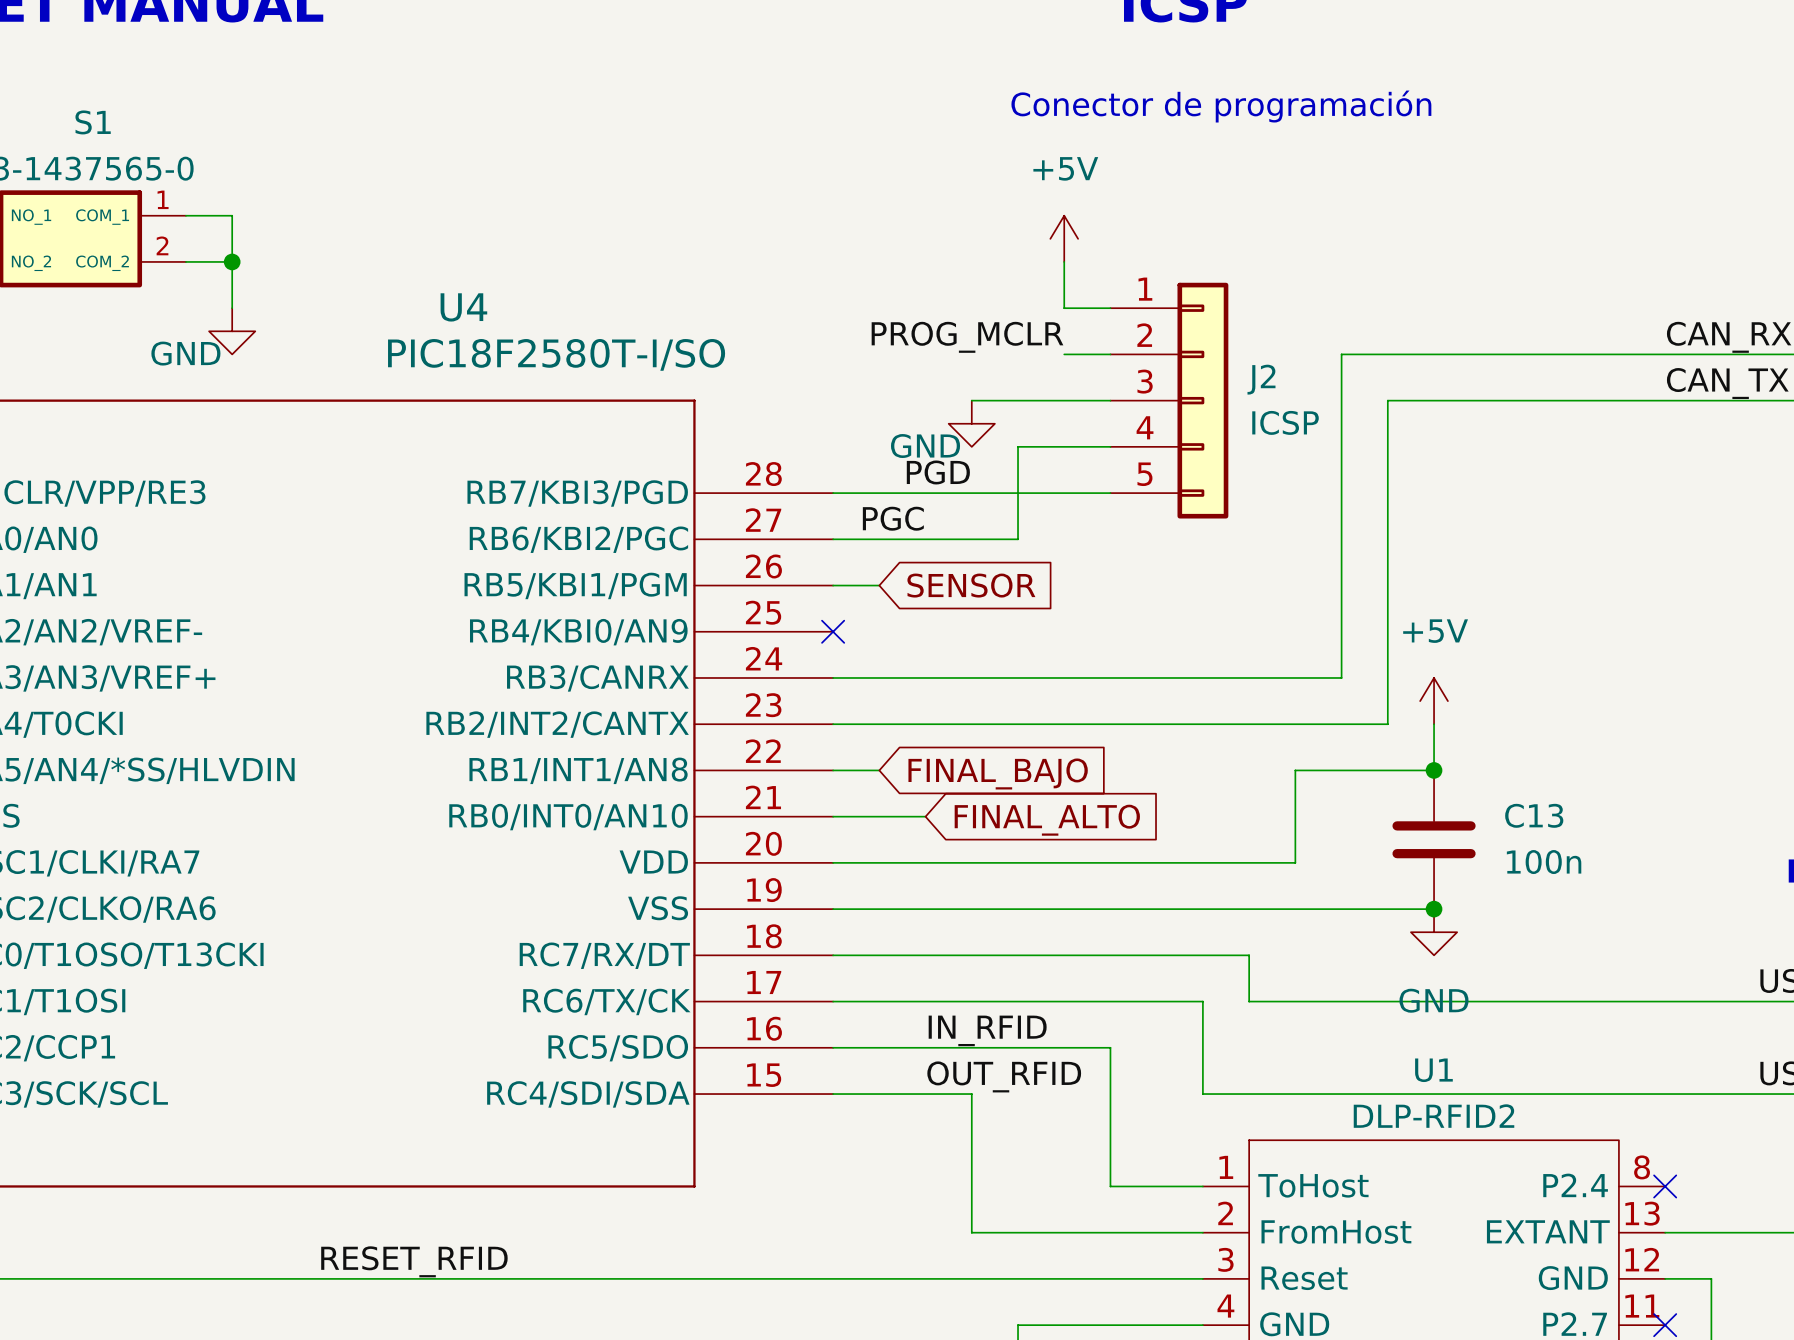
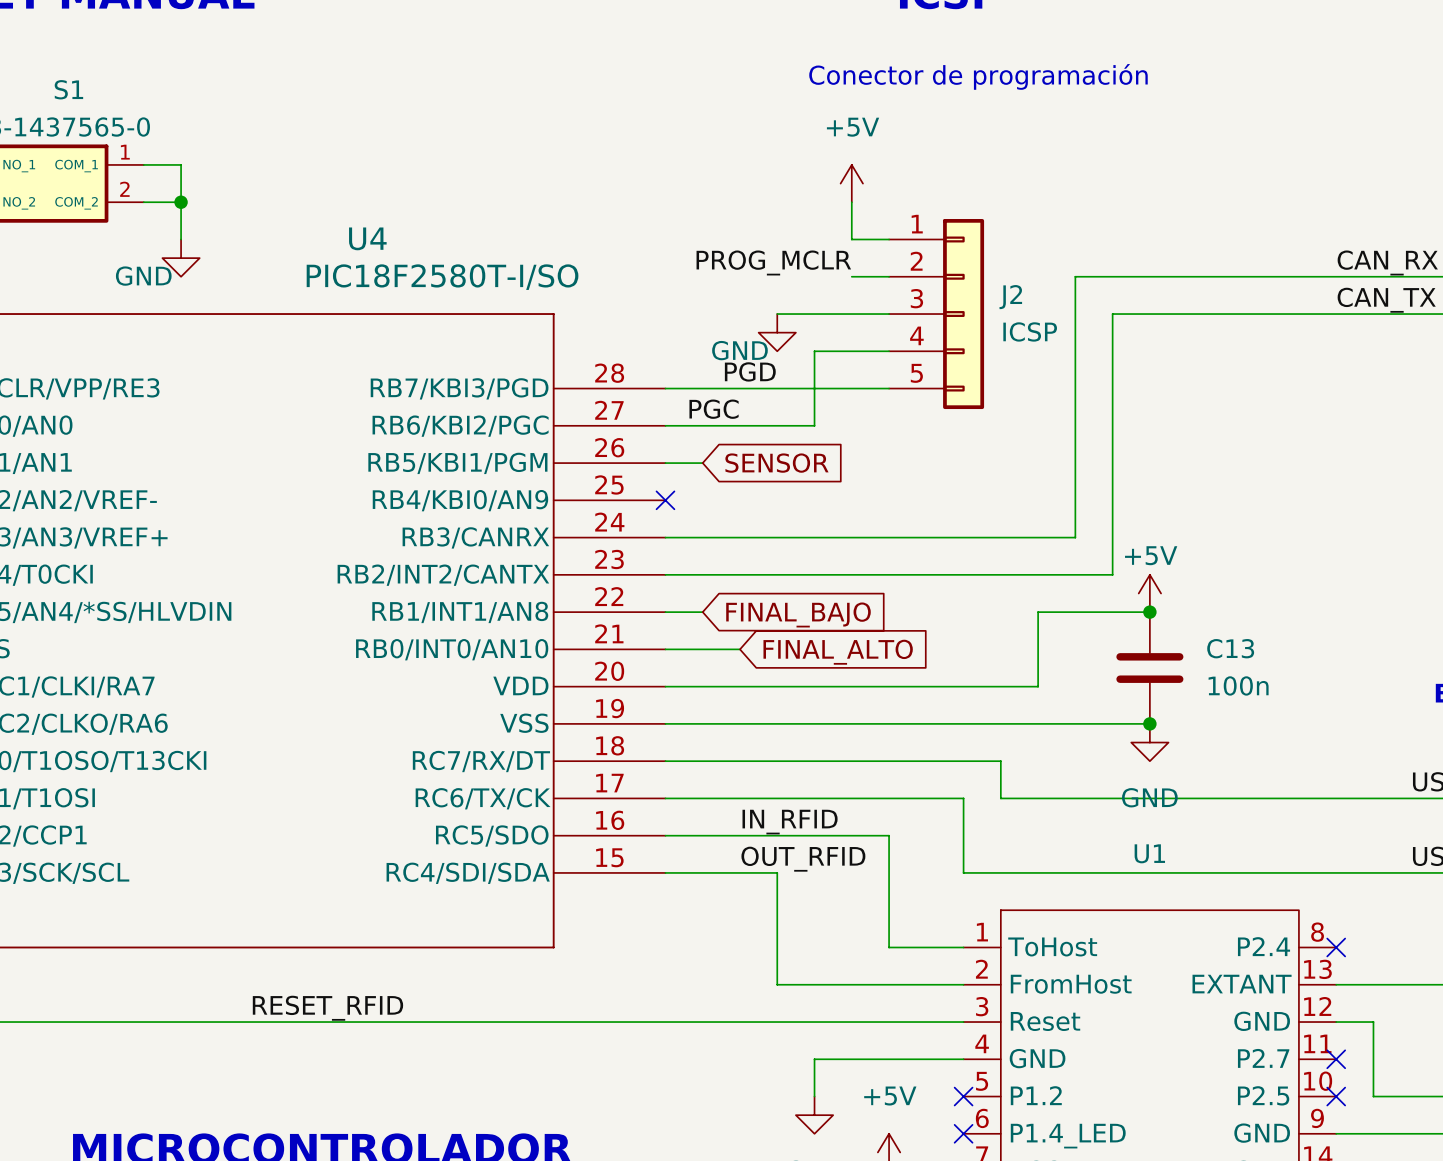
power symbol text position: +5V (1435, 631) -> +5V (1151, 555)
power symbol position: +5V (1434, 701) -> +5V (1149, 593)
U1 value: DLP-RFID2 (1434, 1116) -> none

